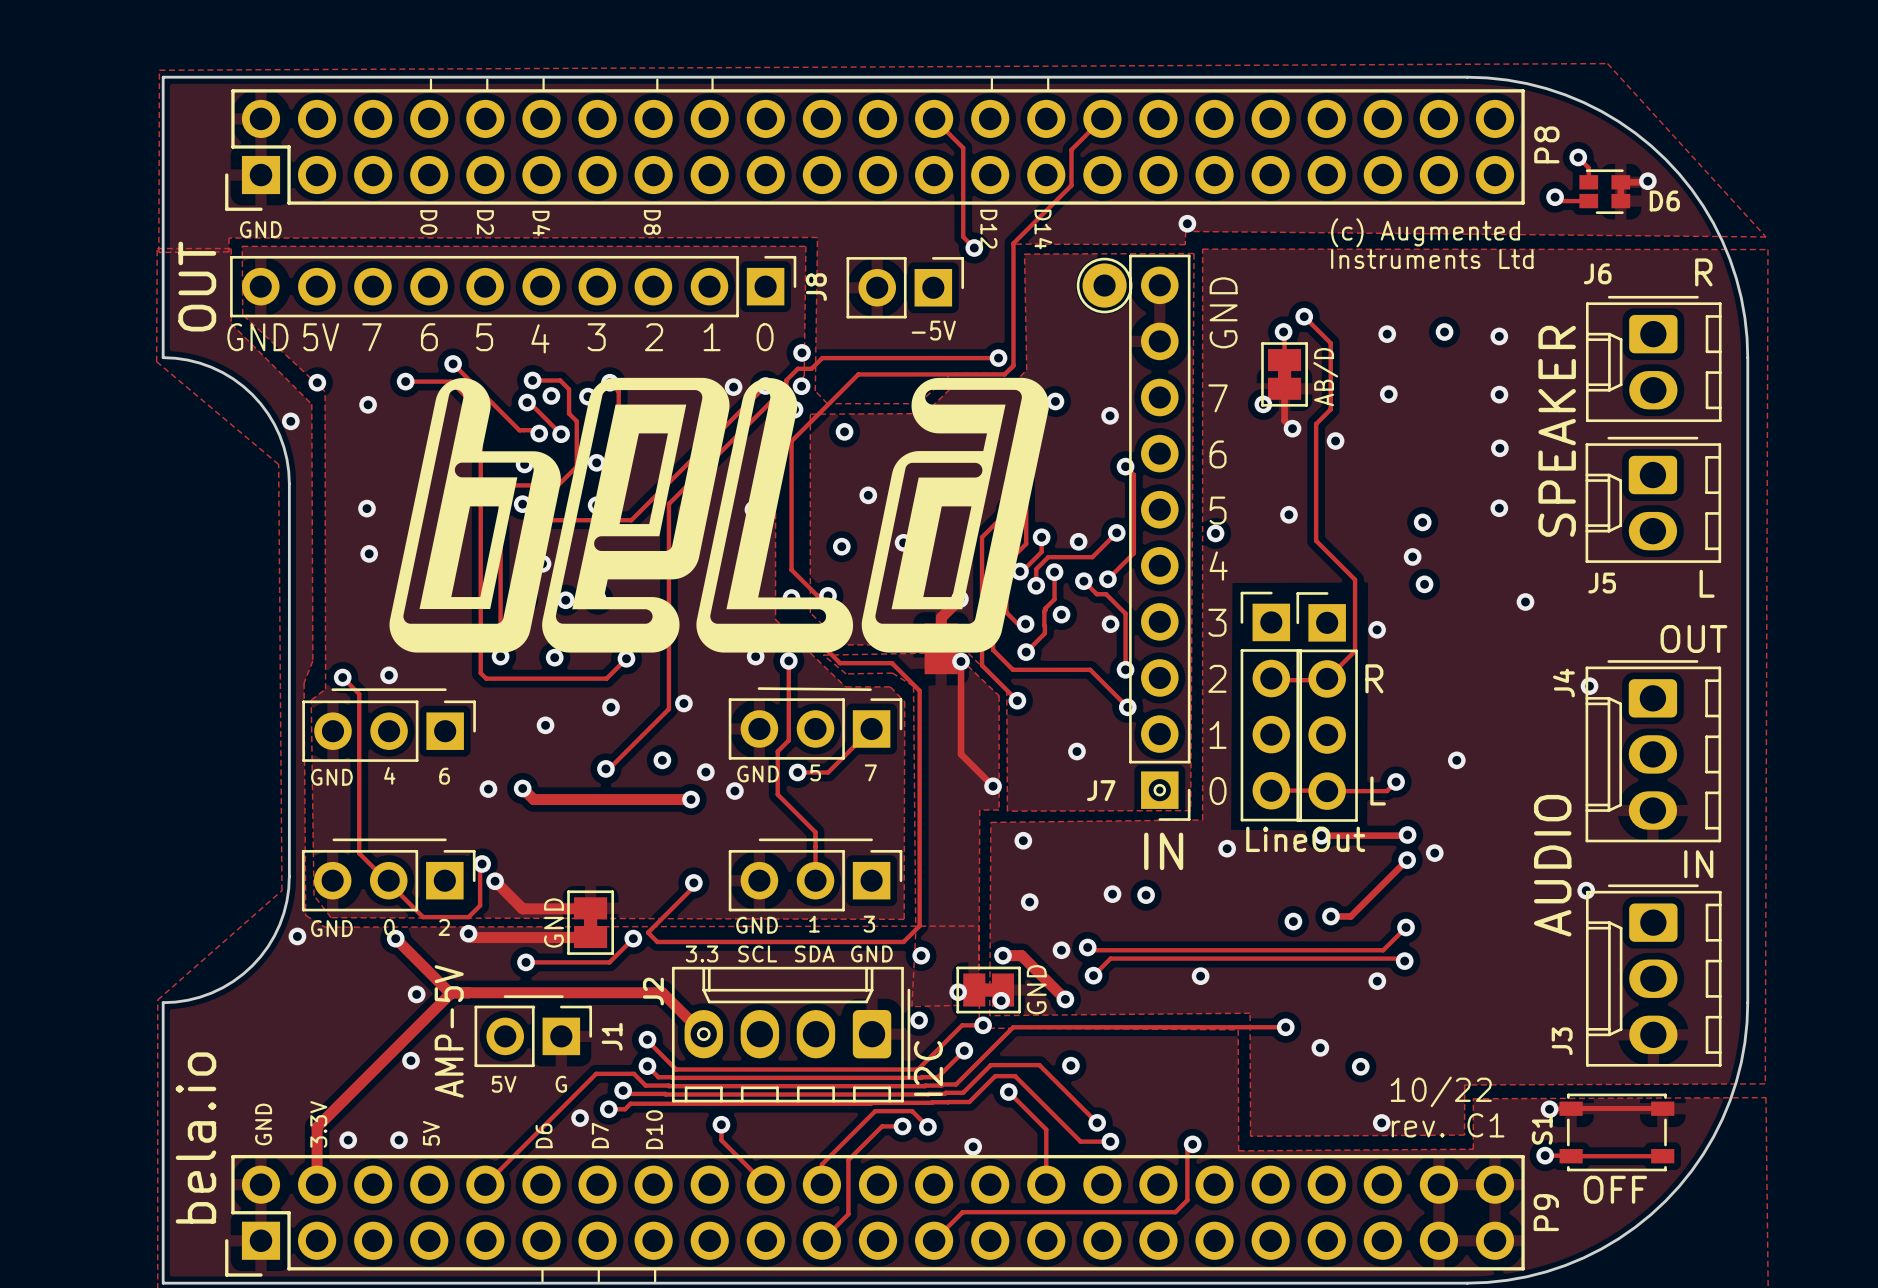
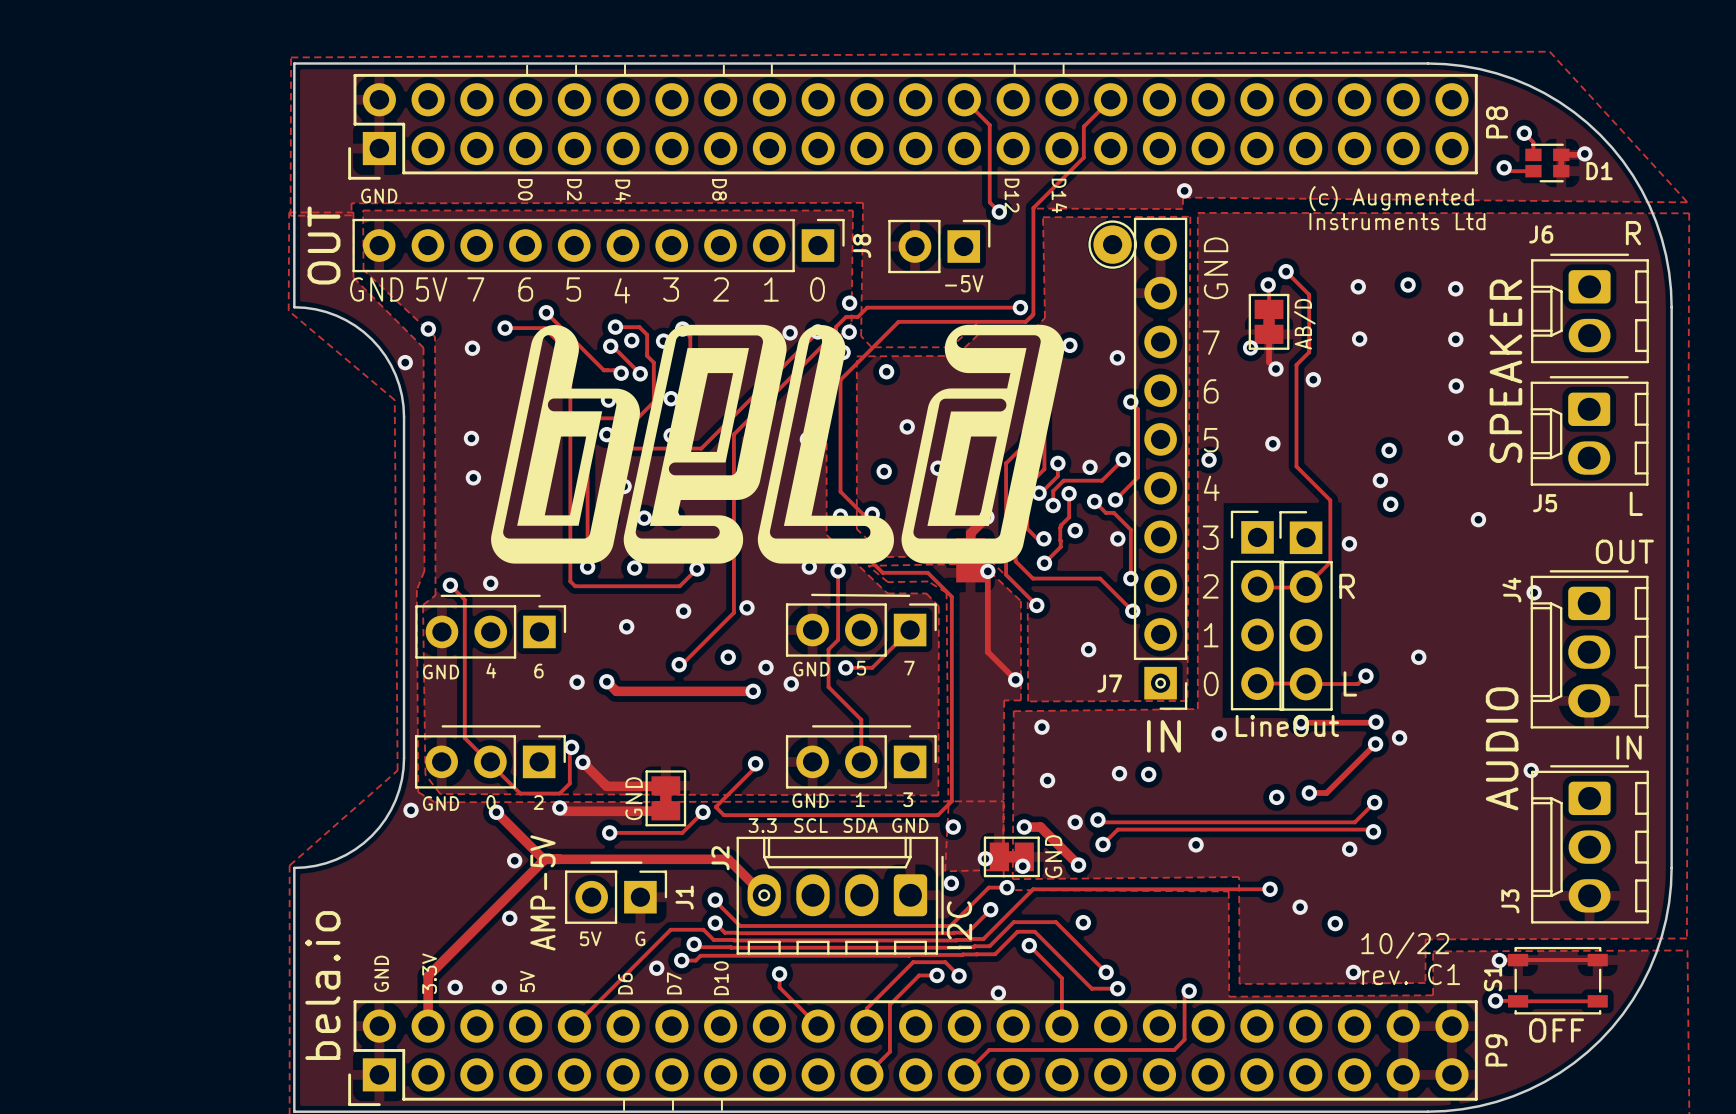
D6 name: D6 (1664, 200) -> D1 (1599, 171)

